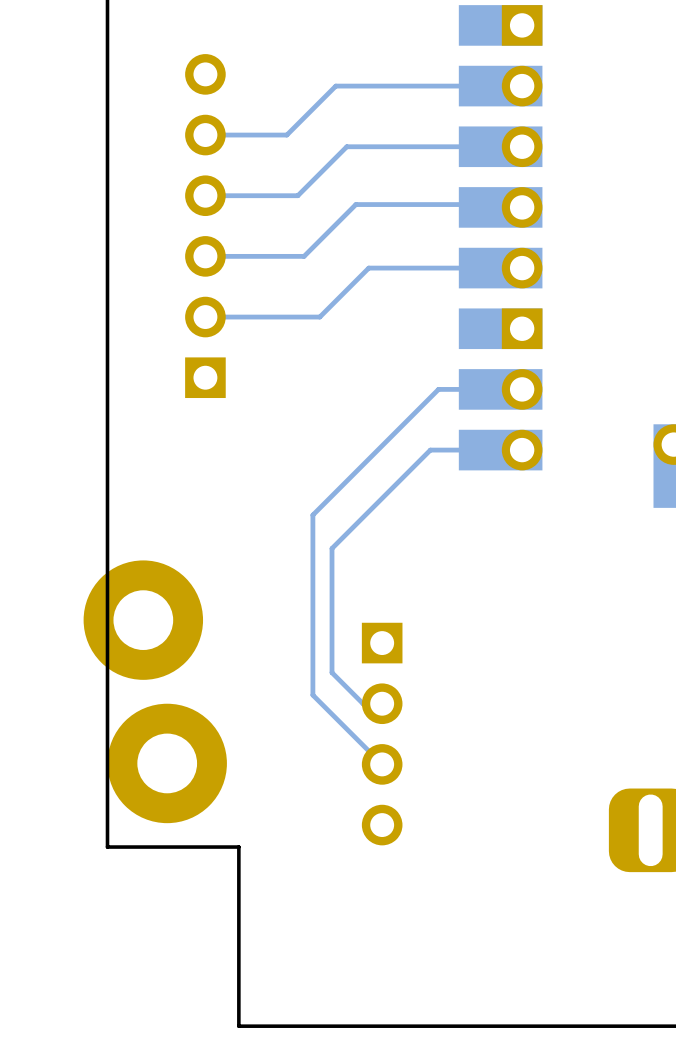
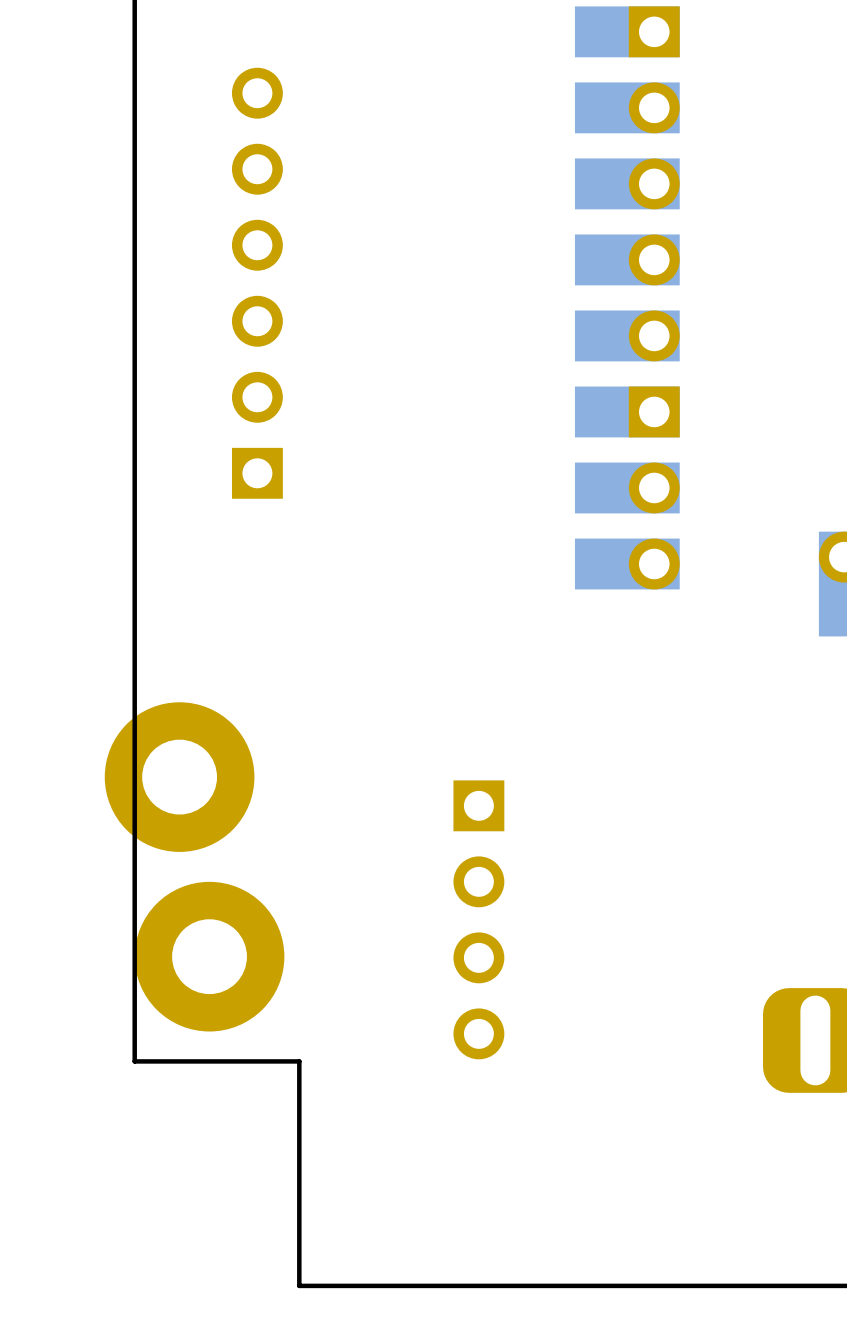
bottom track: (522, 86) (335, 86) (286, 135) (205, 135) -> none
bottom track: (522, 146) (346, 146) (297, 195) (205, 195) -> none
bottom track: (522, 207) (519, 204) (355, 204) (304, 256) (205, 256) -> none
bottom track: (522, 268) (368, 268) (319, 317) (205, 317) -> none
bottom track: (522, 389) (438, 389) (312, 515) (312, 695) (382, 764) -> none
bottom track: (522, 450) (430, 450) (332, 548) (332, 672) (363, 703) (382, 703) -> none

